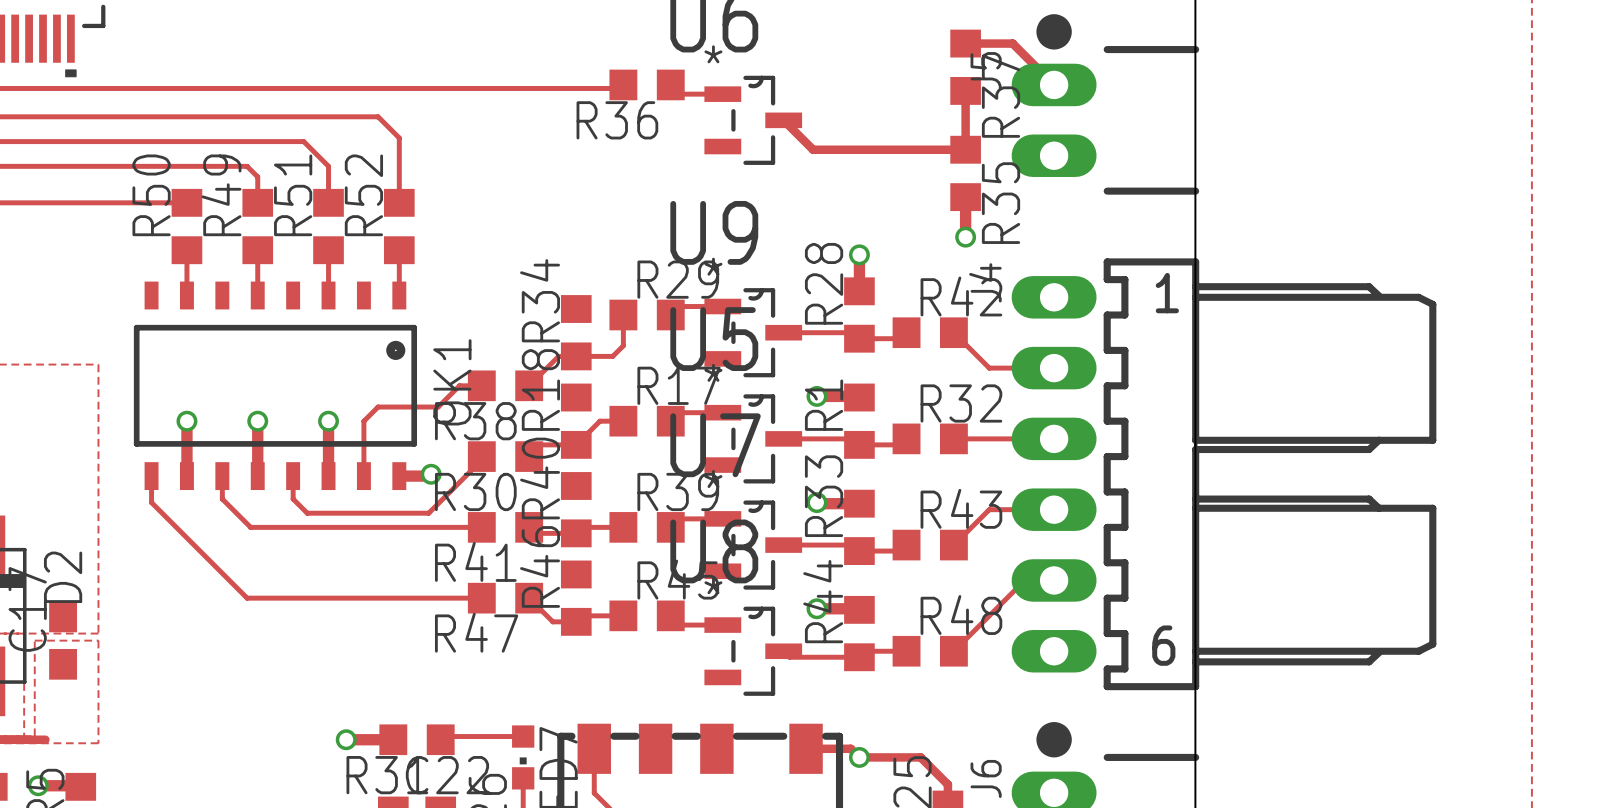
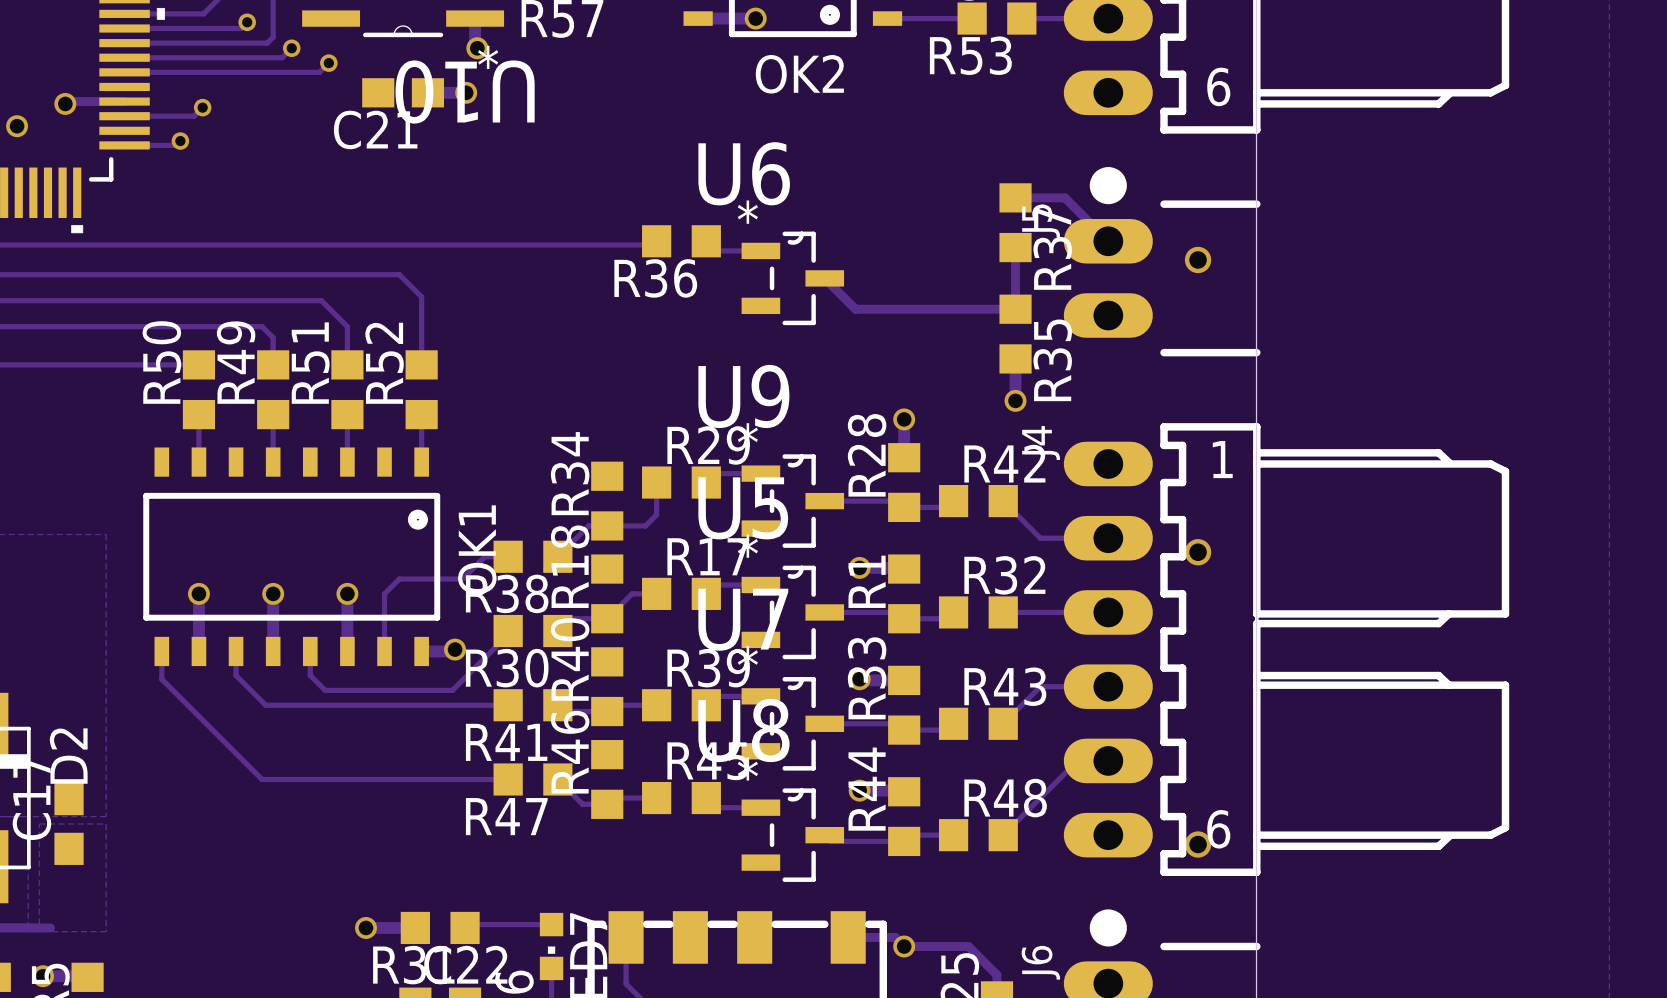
via: none -> (1198, 259)
via: none -> (1198, 552)
via: none -> (1198, 844)

